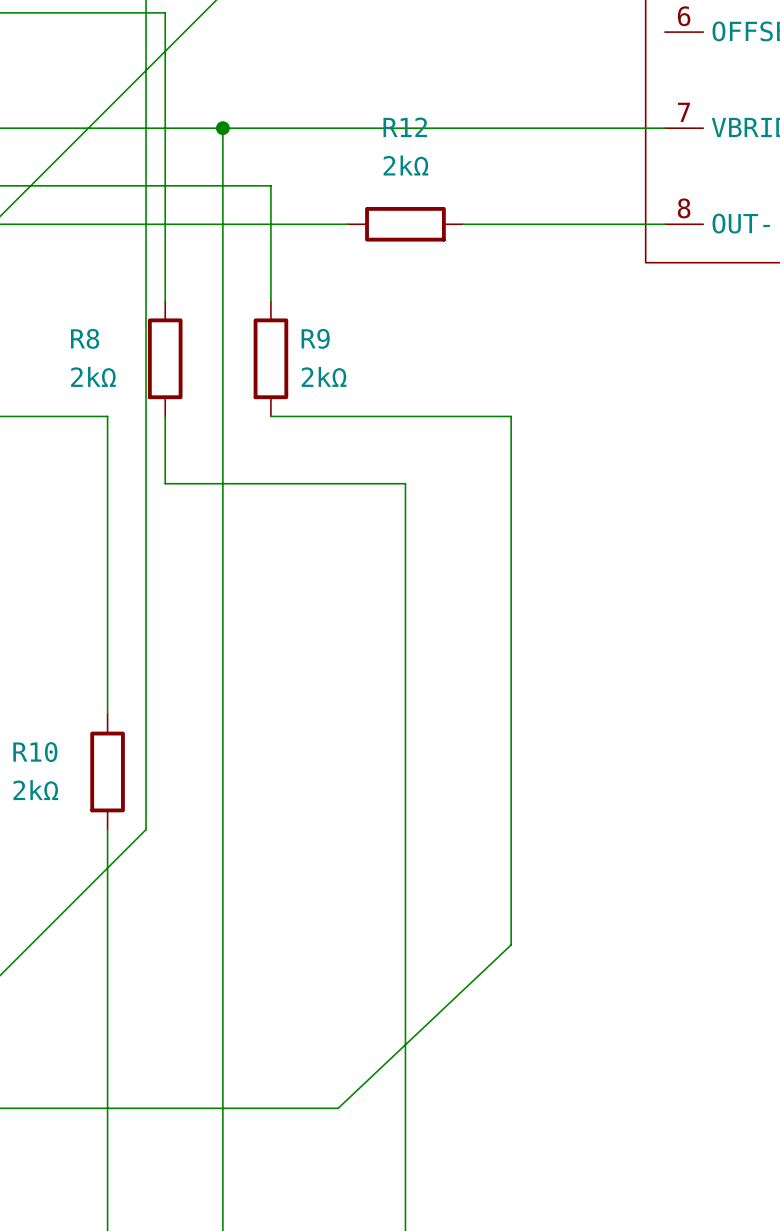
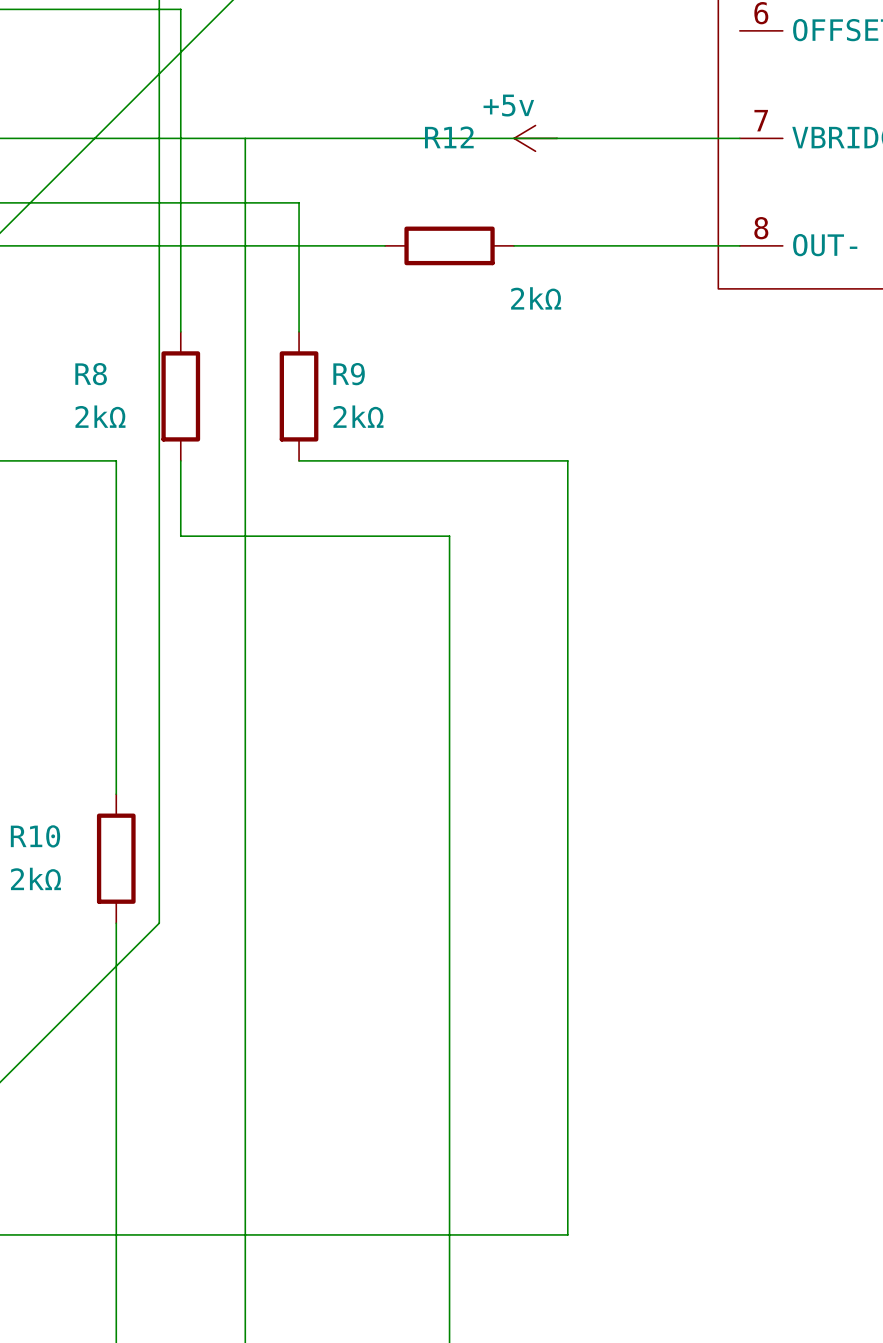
junction: (222, 128) -> none
power symbol: none -> +5v (535, 138)
R12 value position: 2kΩ (405, 165) -> 2kΩ (536, 298)
wire: (511, 944) (338, 1108) -> (567, 1052) (567, 1234) (374, 1234)

